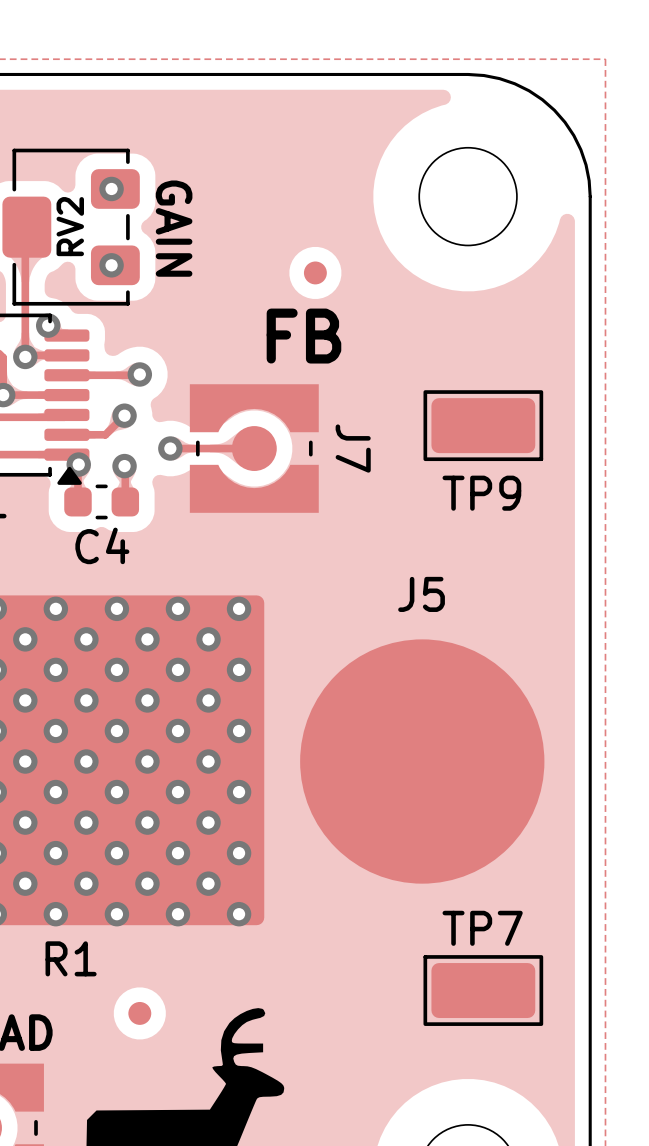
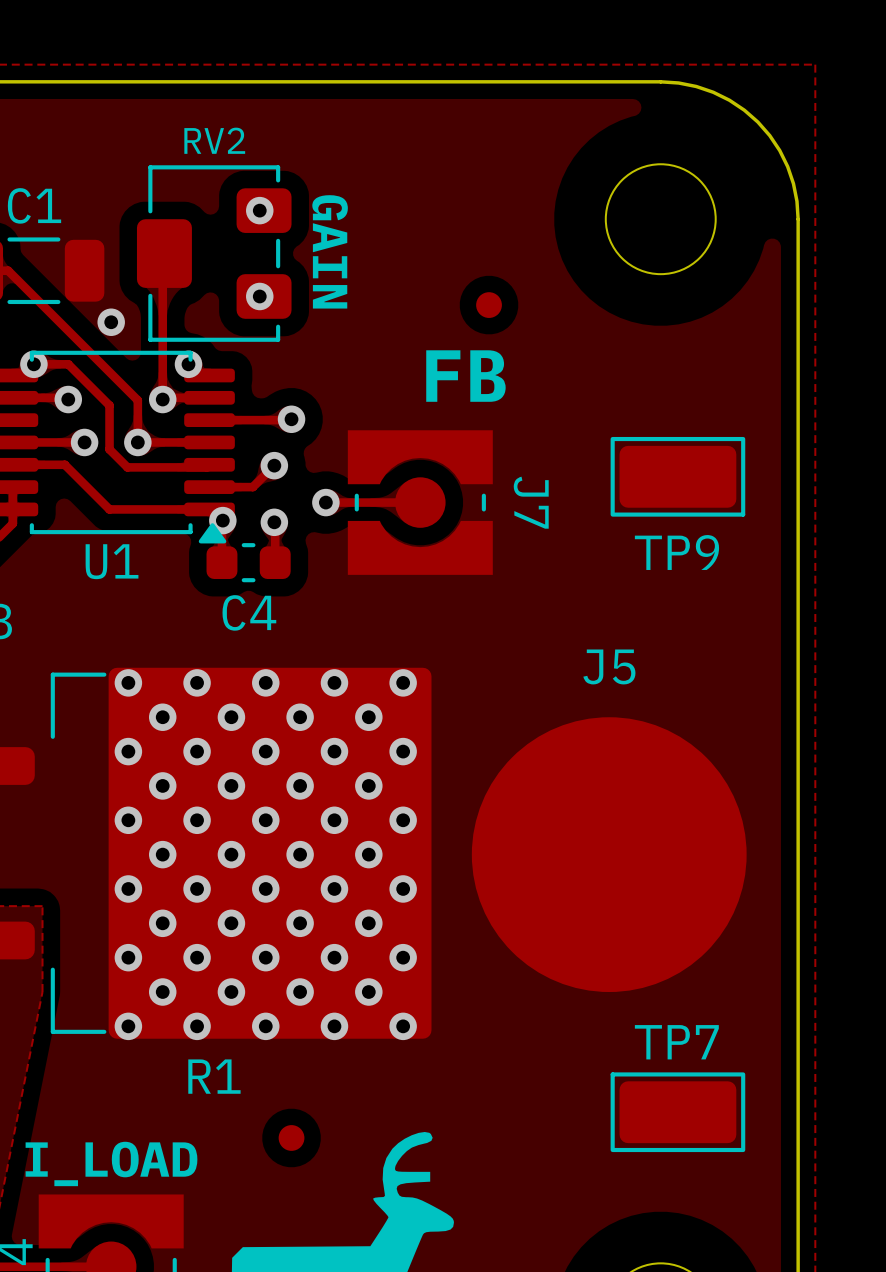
RV2 name rotation: 0° (70, 226) -> 90° clockwise (214, 140)
RV2 name position: RV2 (70, 226) -> RV2 (214, 140)

